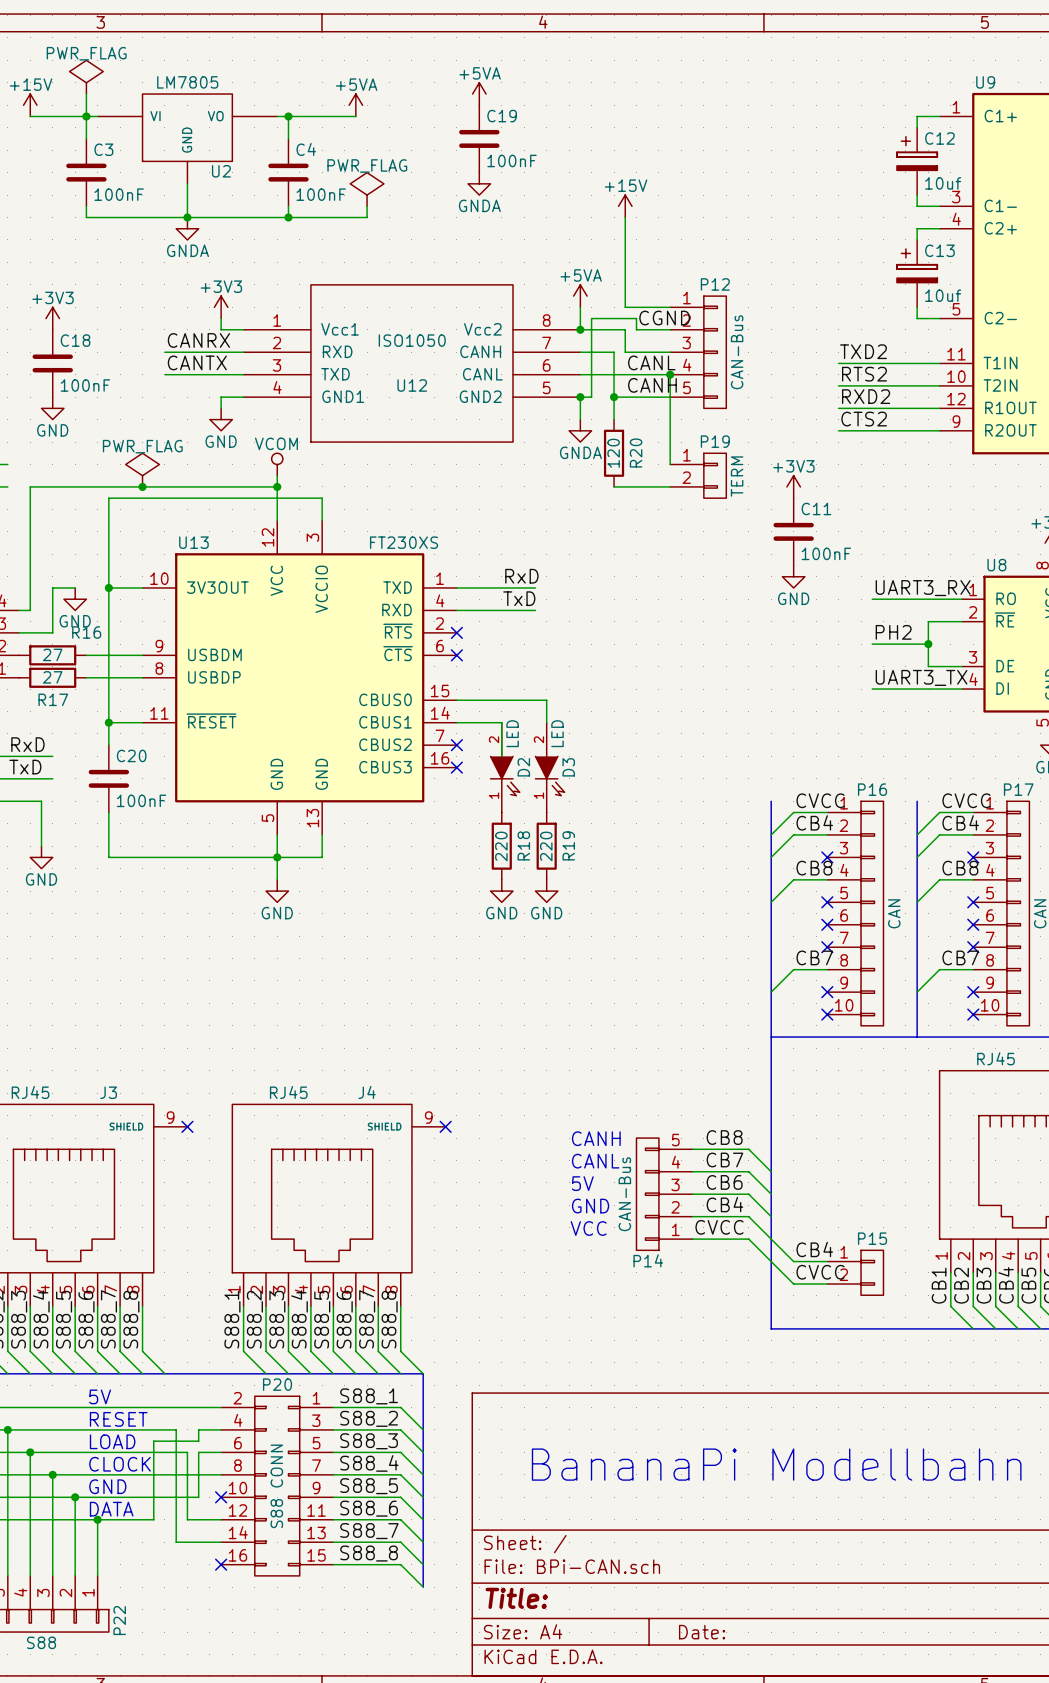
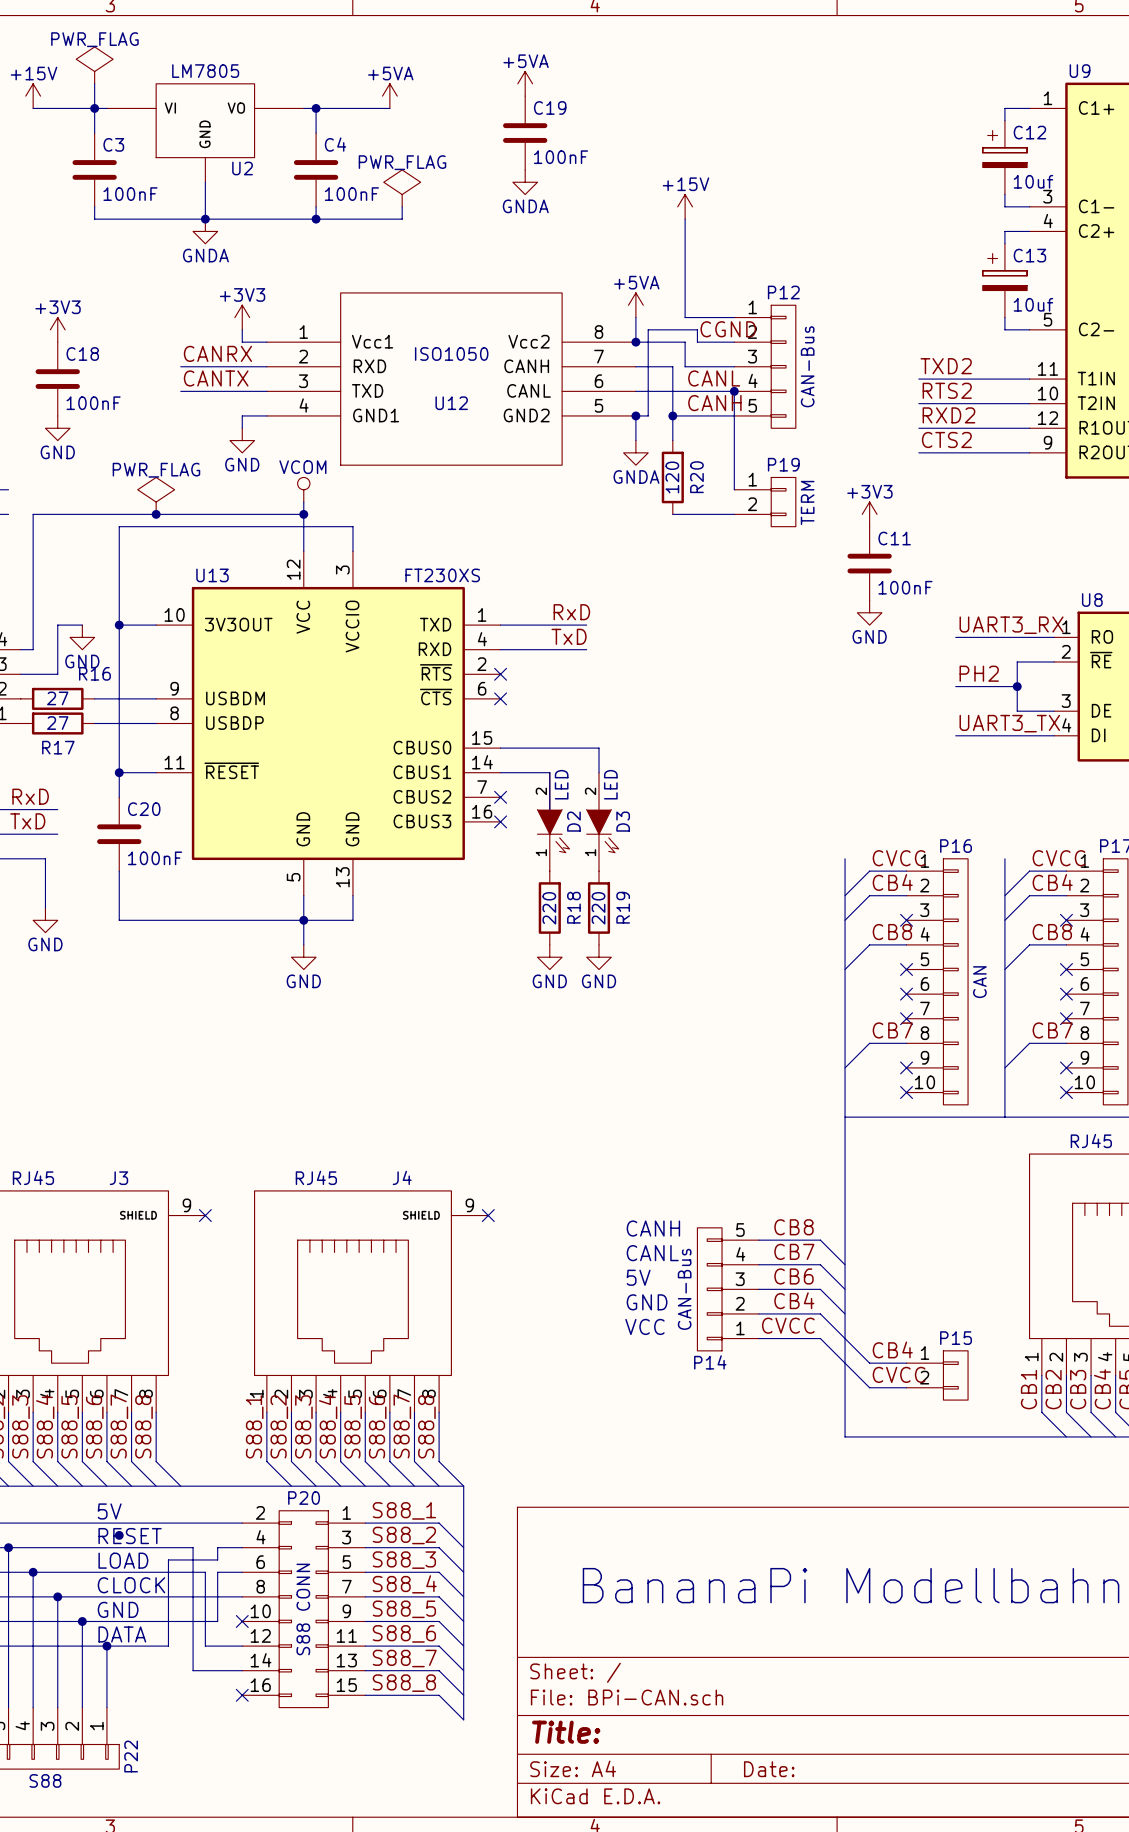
junction: none -> (119, 1535)

